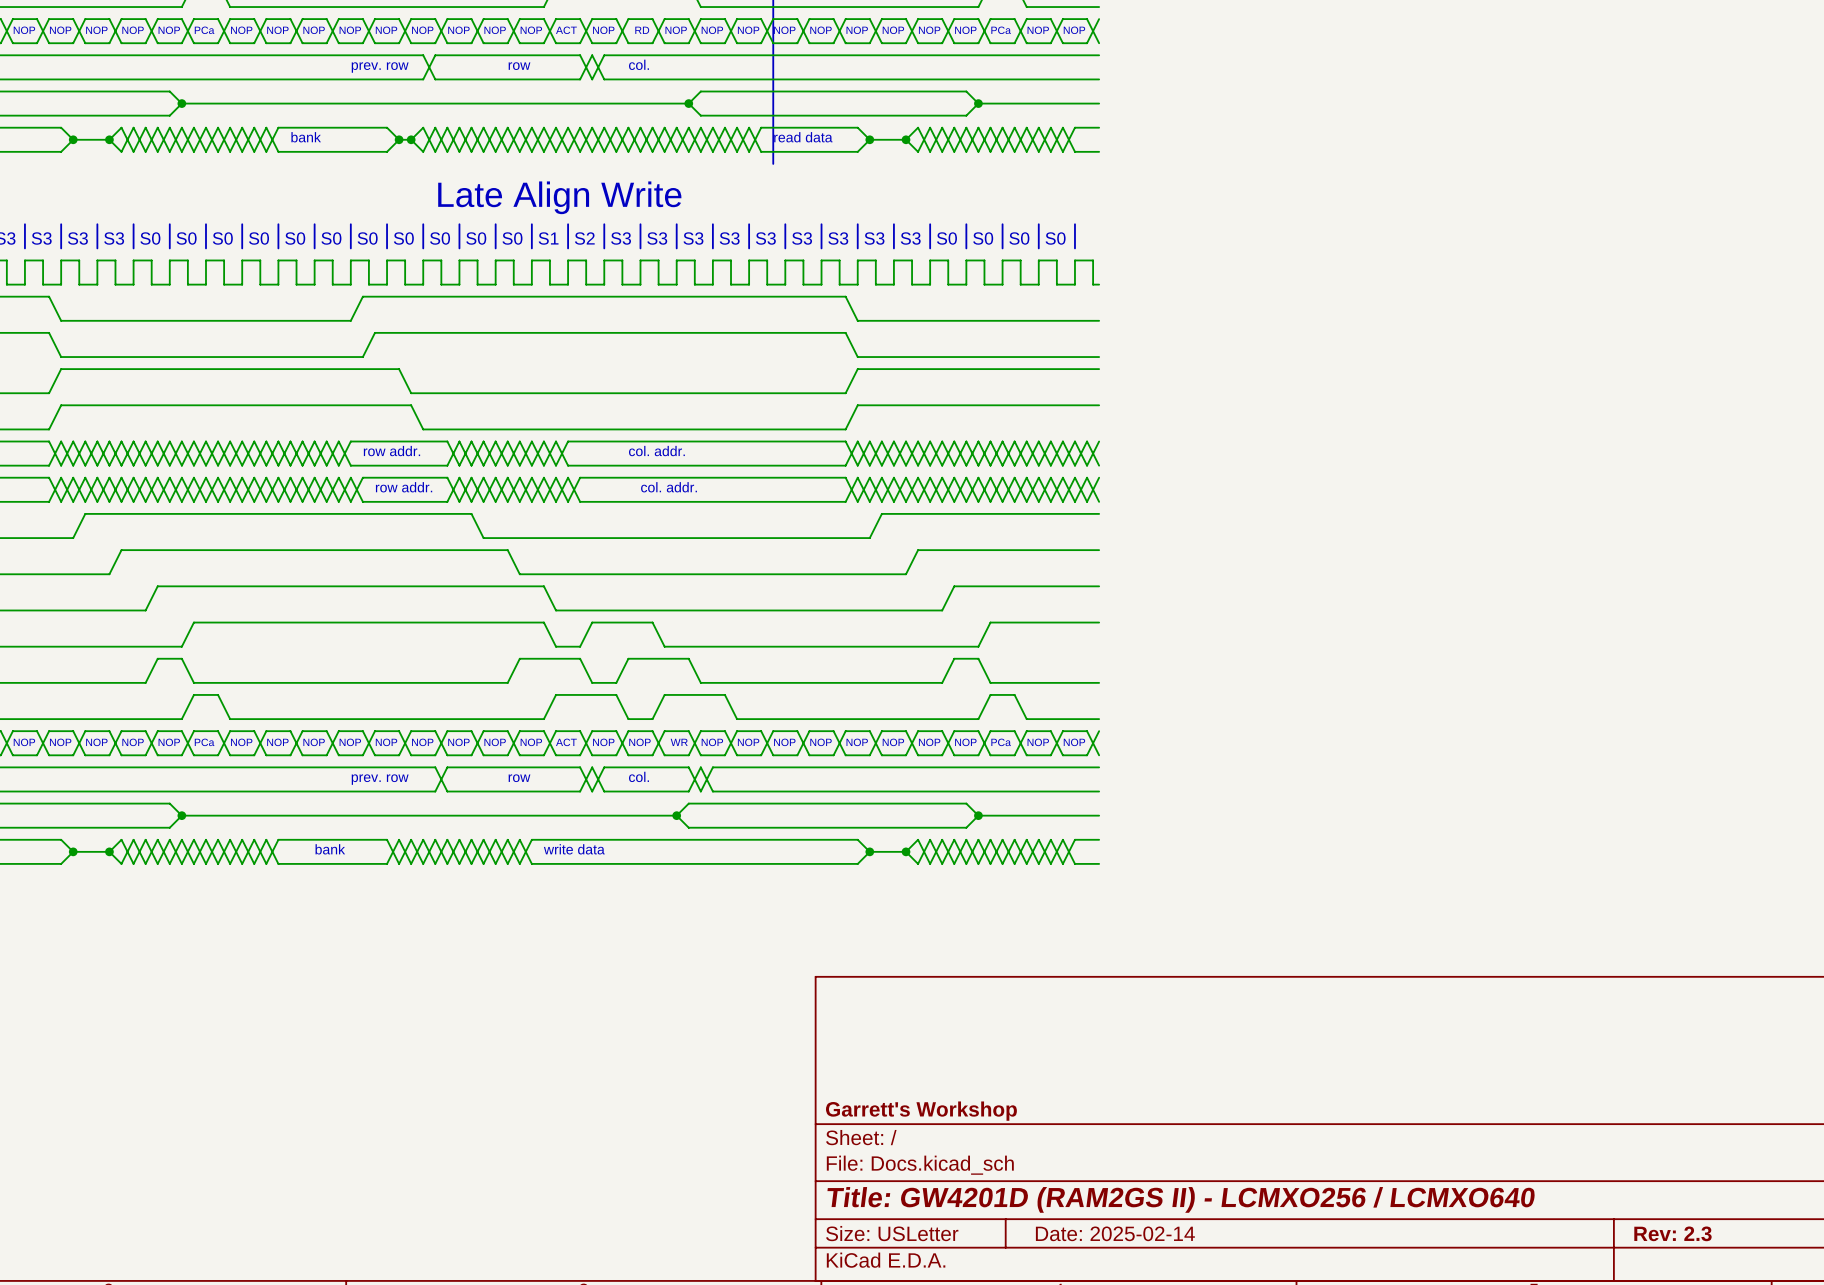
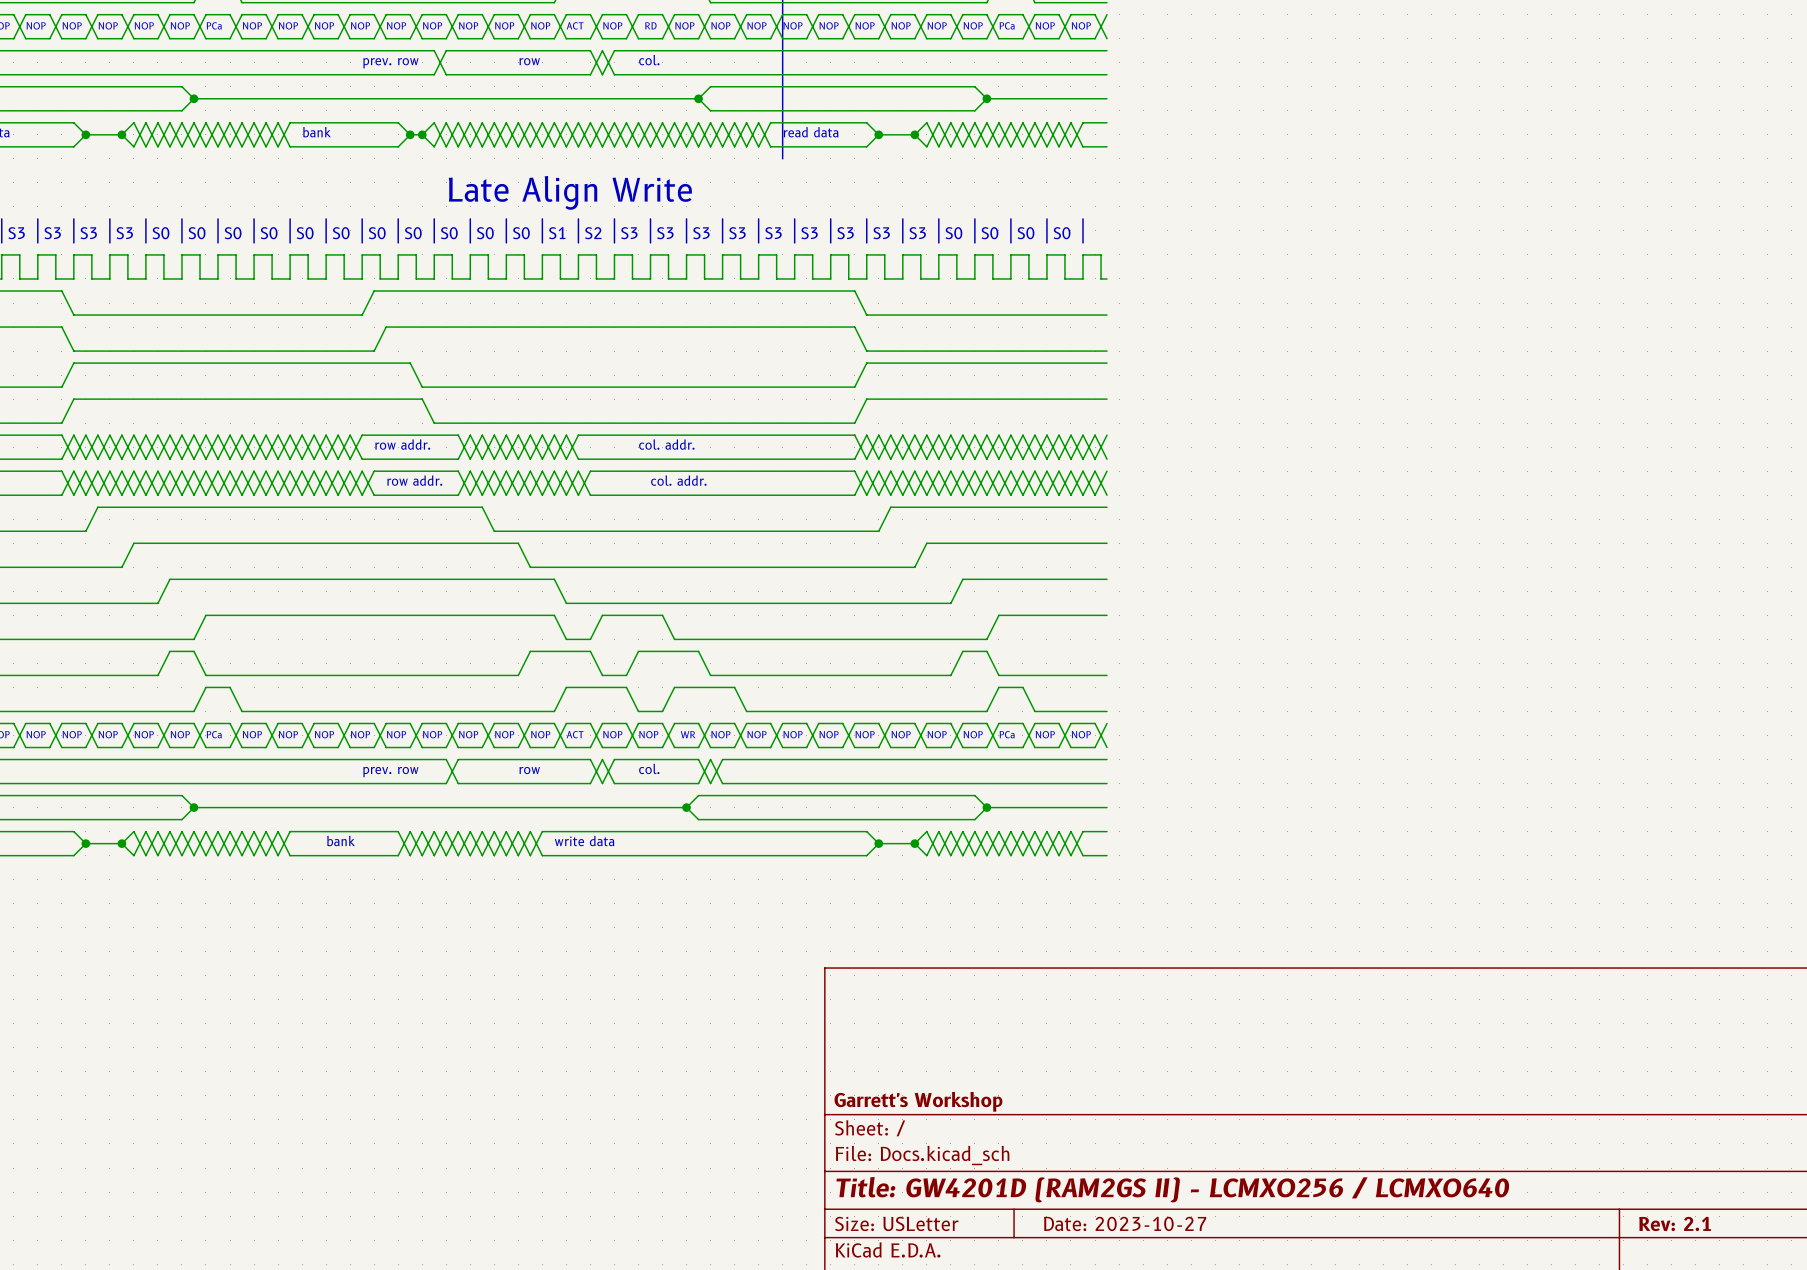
title block: Date: 2025-02-14 (1115, 1233) -> Date: 2023-10-27 (1125, 1223)
title block: Rev: 2.3 (1672, 1233) -> Rev: 2.1 (1675, 1223)

